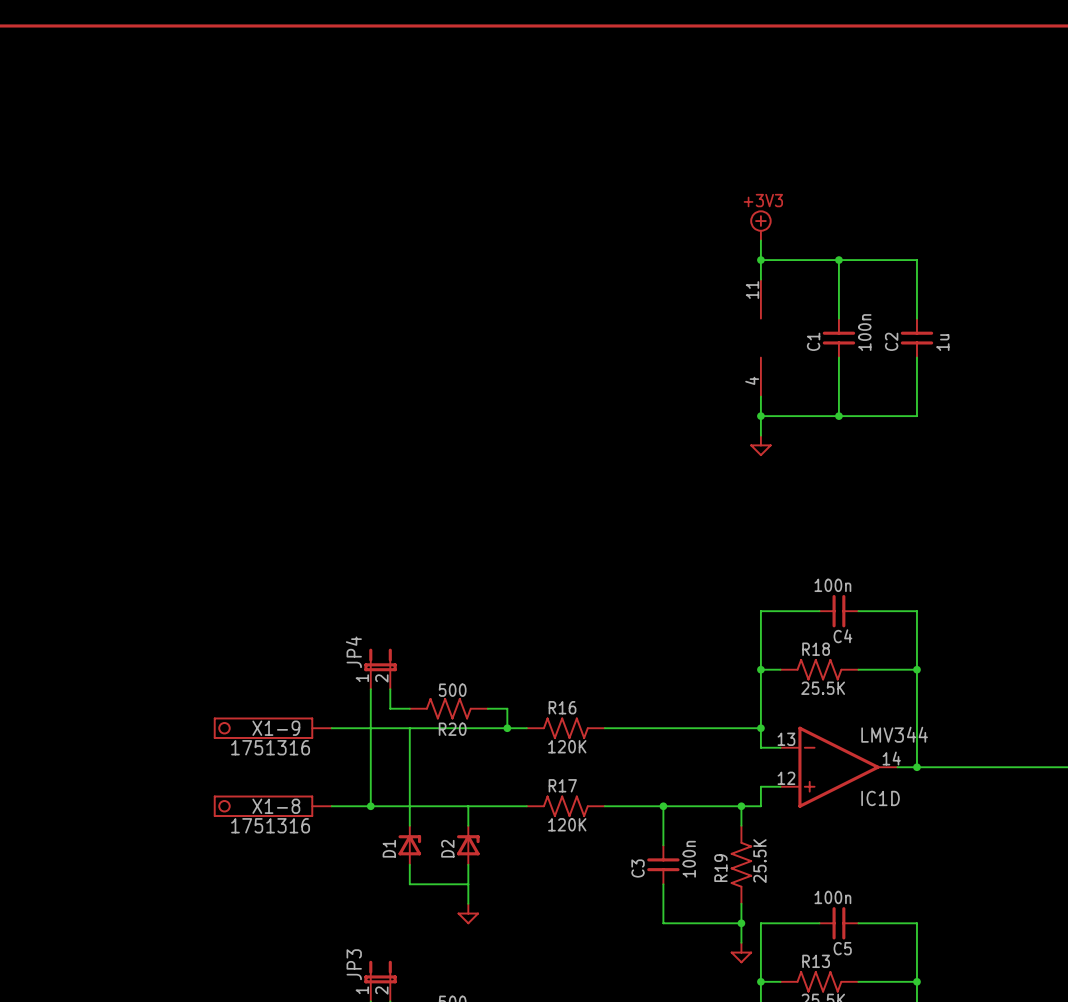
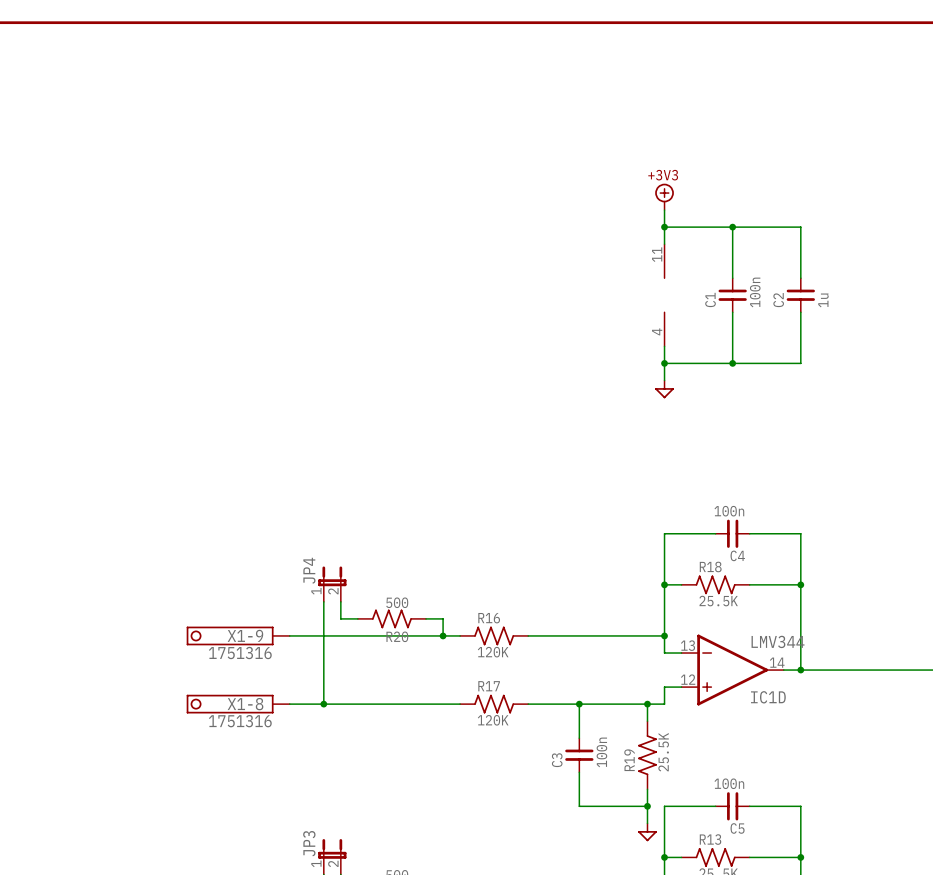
wire: (409, 728) (409, 825) -> none
wire: (468, 806) (468, 825) -> none
D1: (409, 845) -> none
D2: (468, 845) -> none
wire: (409, 864) (409, 884) (468, 884) -> none
wire: (468, 864) (468, 903) -> none
power symbol: (468, 913) -> none

